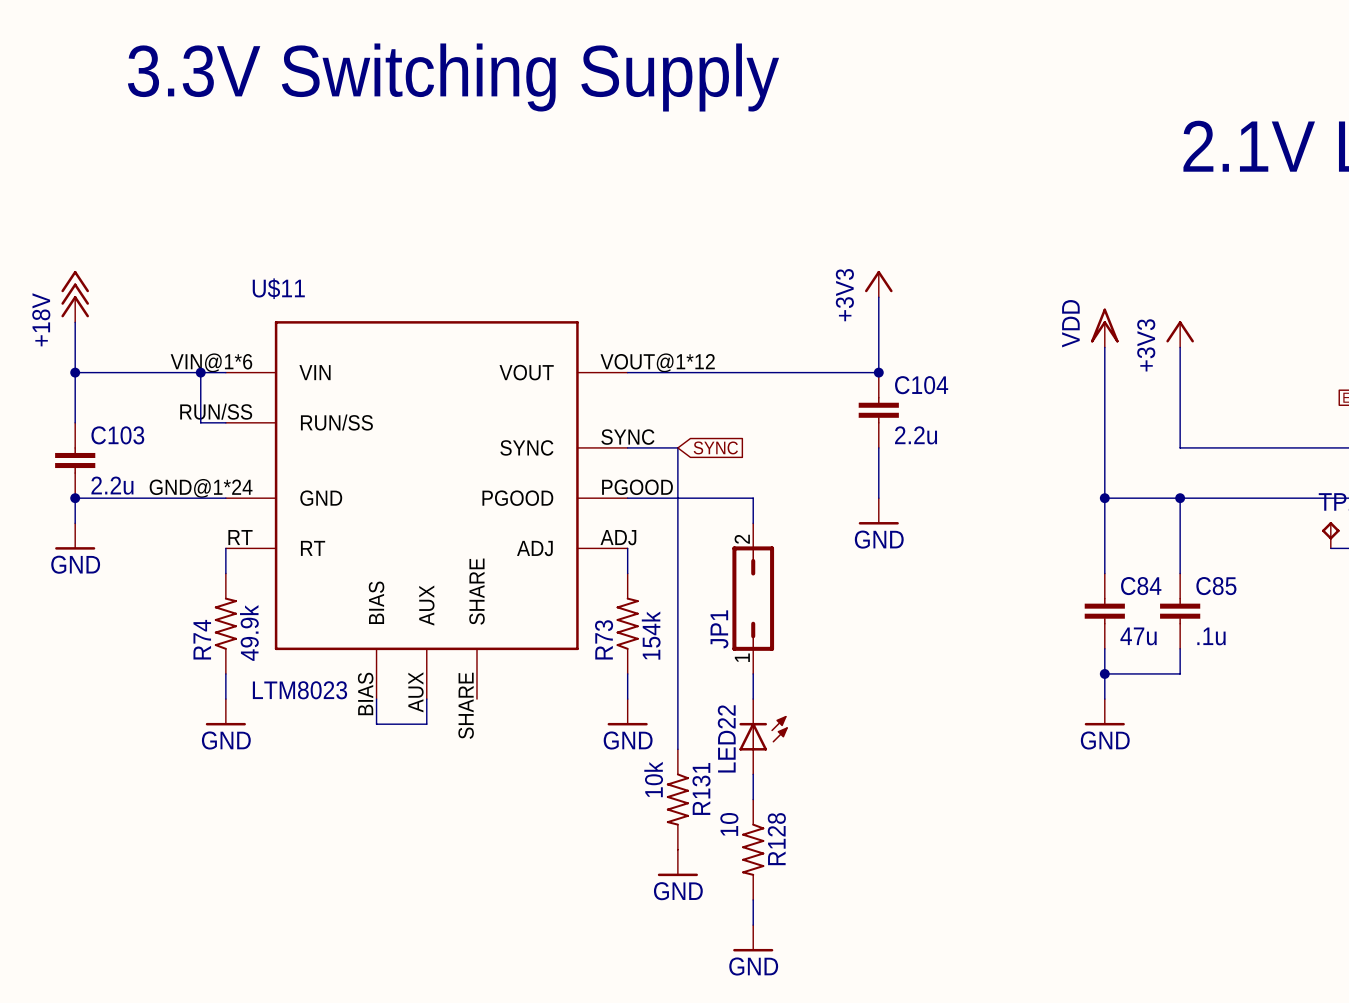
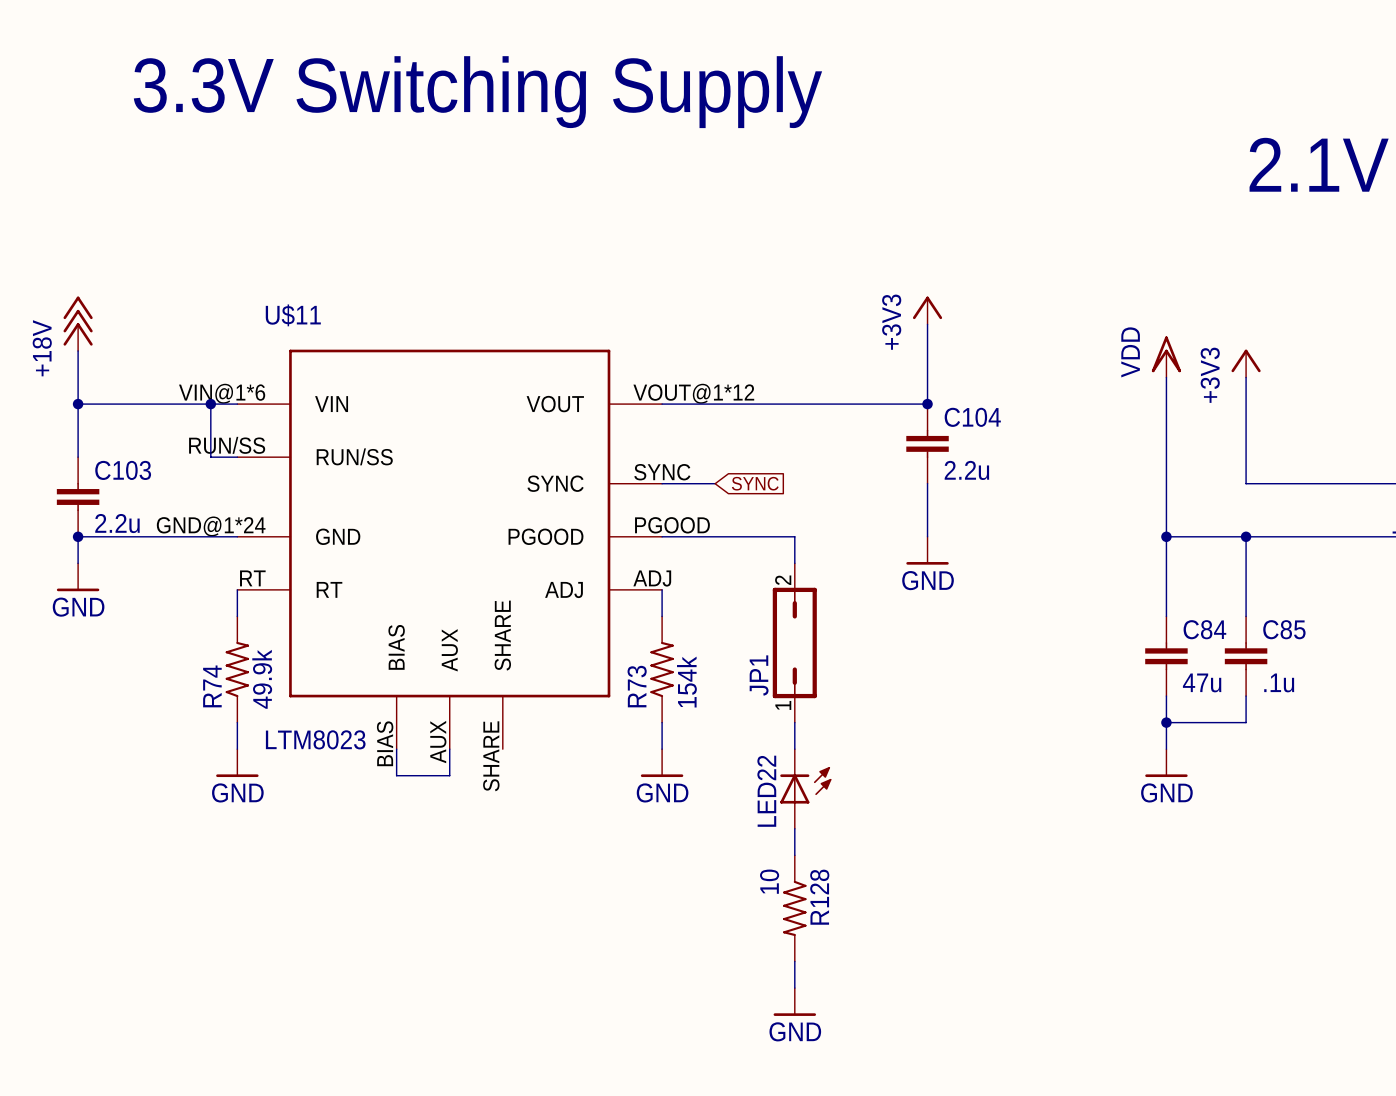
wire: (677, 447) (677, 749) -> none
R131: 10k (677, 799) -> none
power symbol: GND (677, 862) -> none

